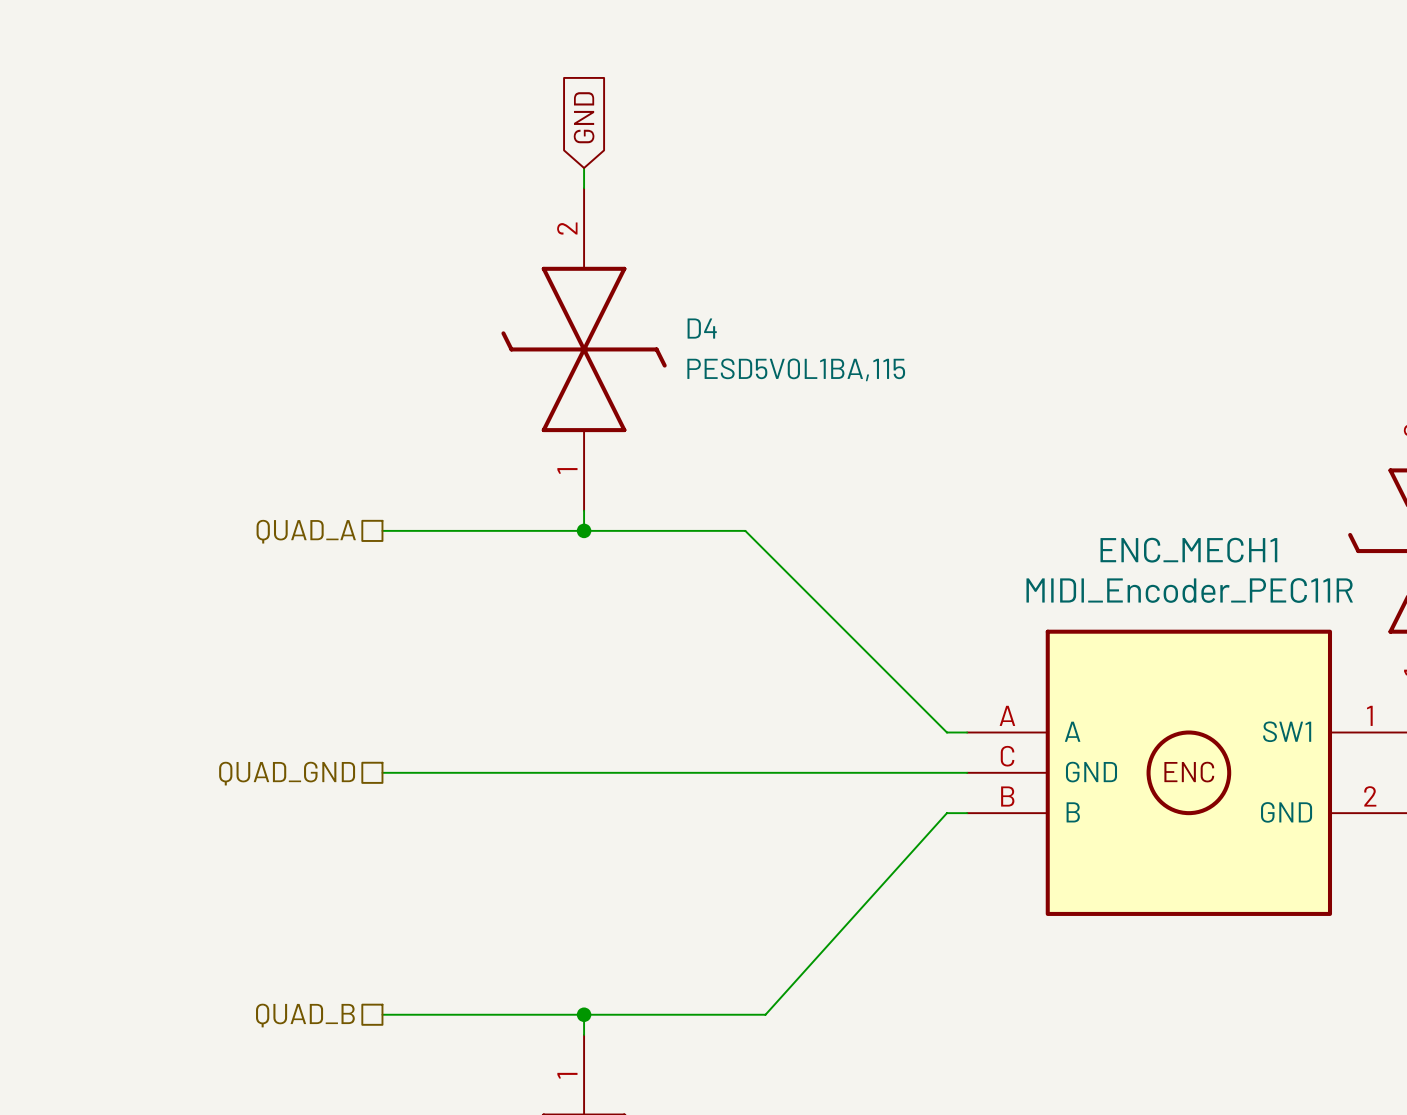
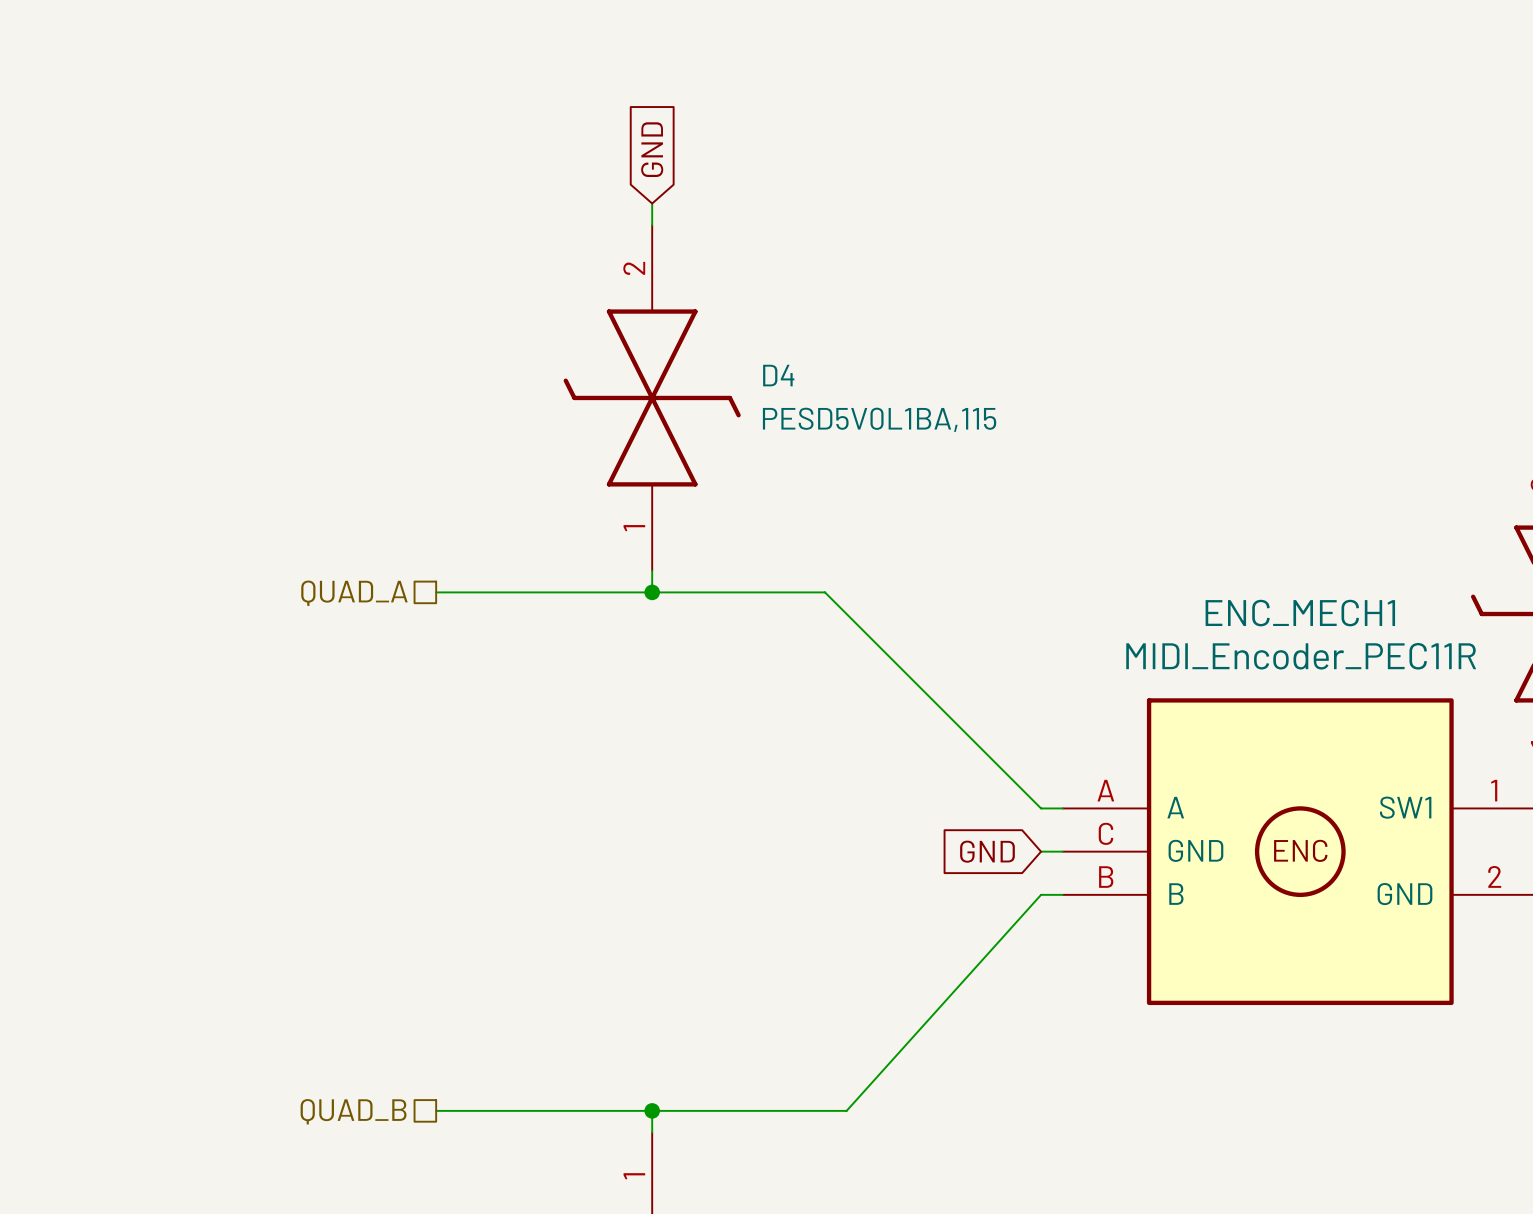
wire: (382, 772) (946, 772) -> none
global label: none -> GND (987, 851)
hierarchical label: QUAD_GND (287, 773) -> none

